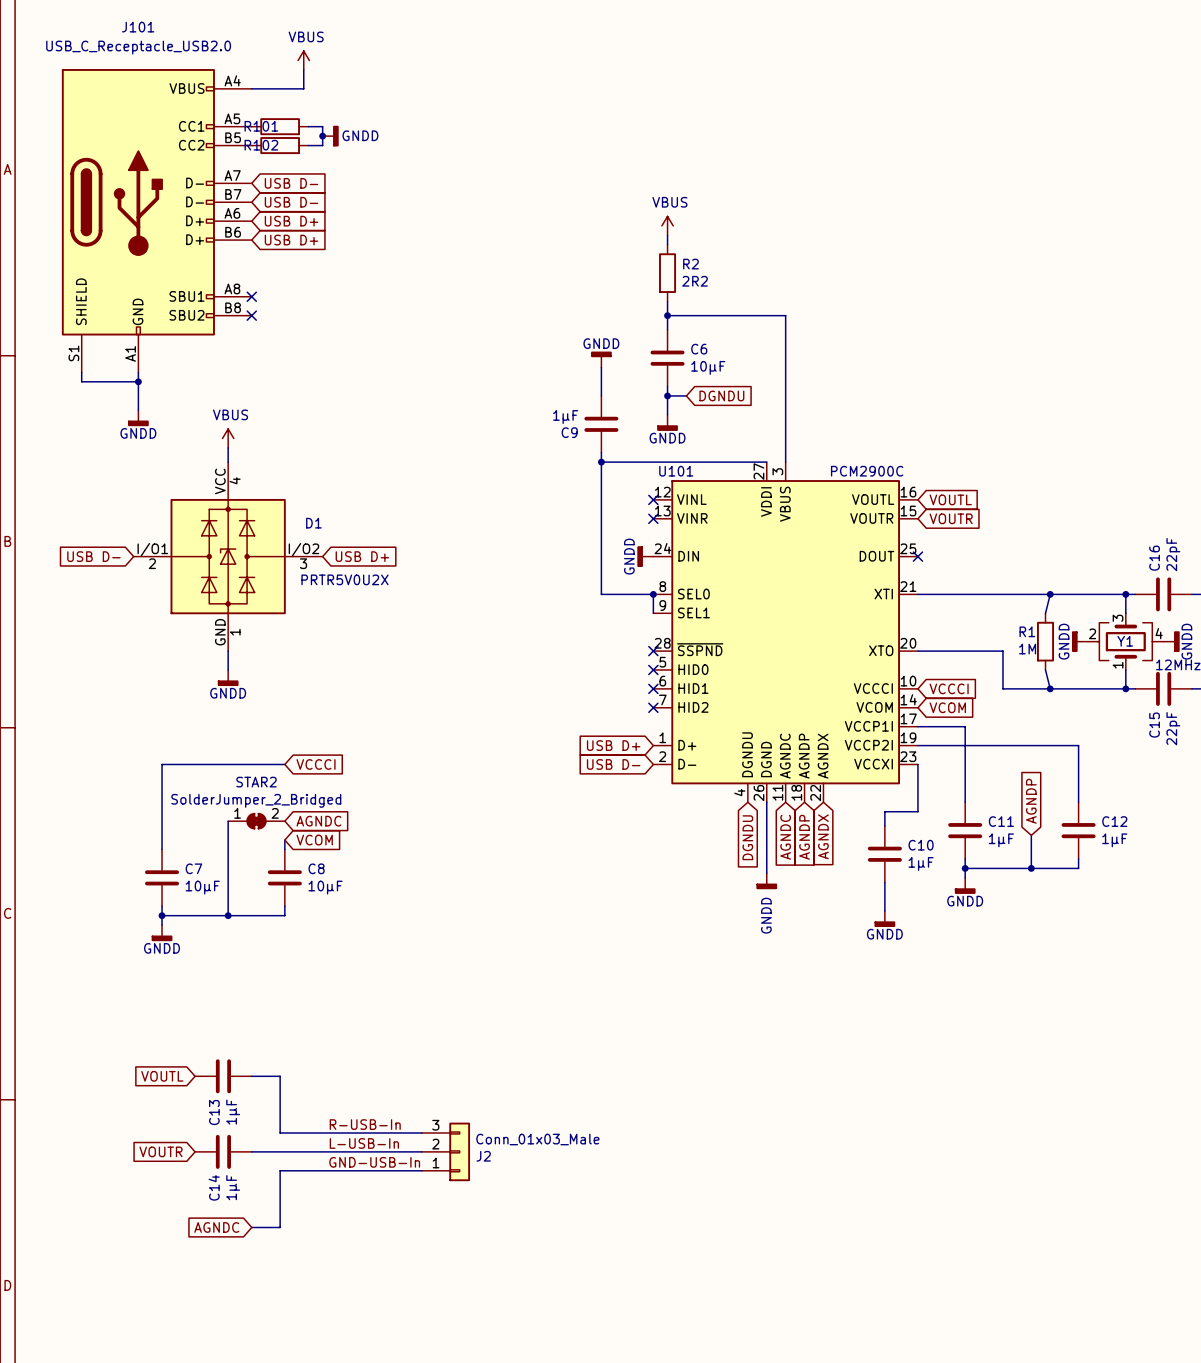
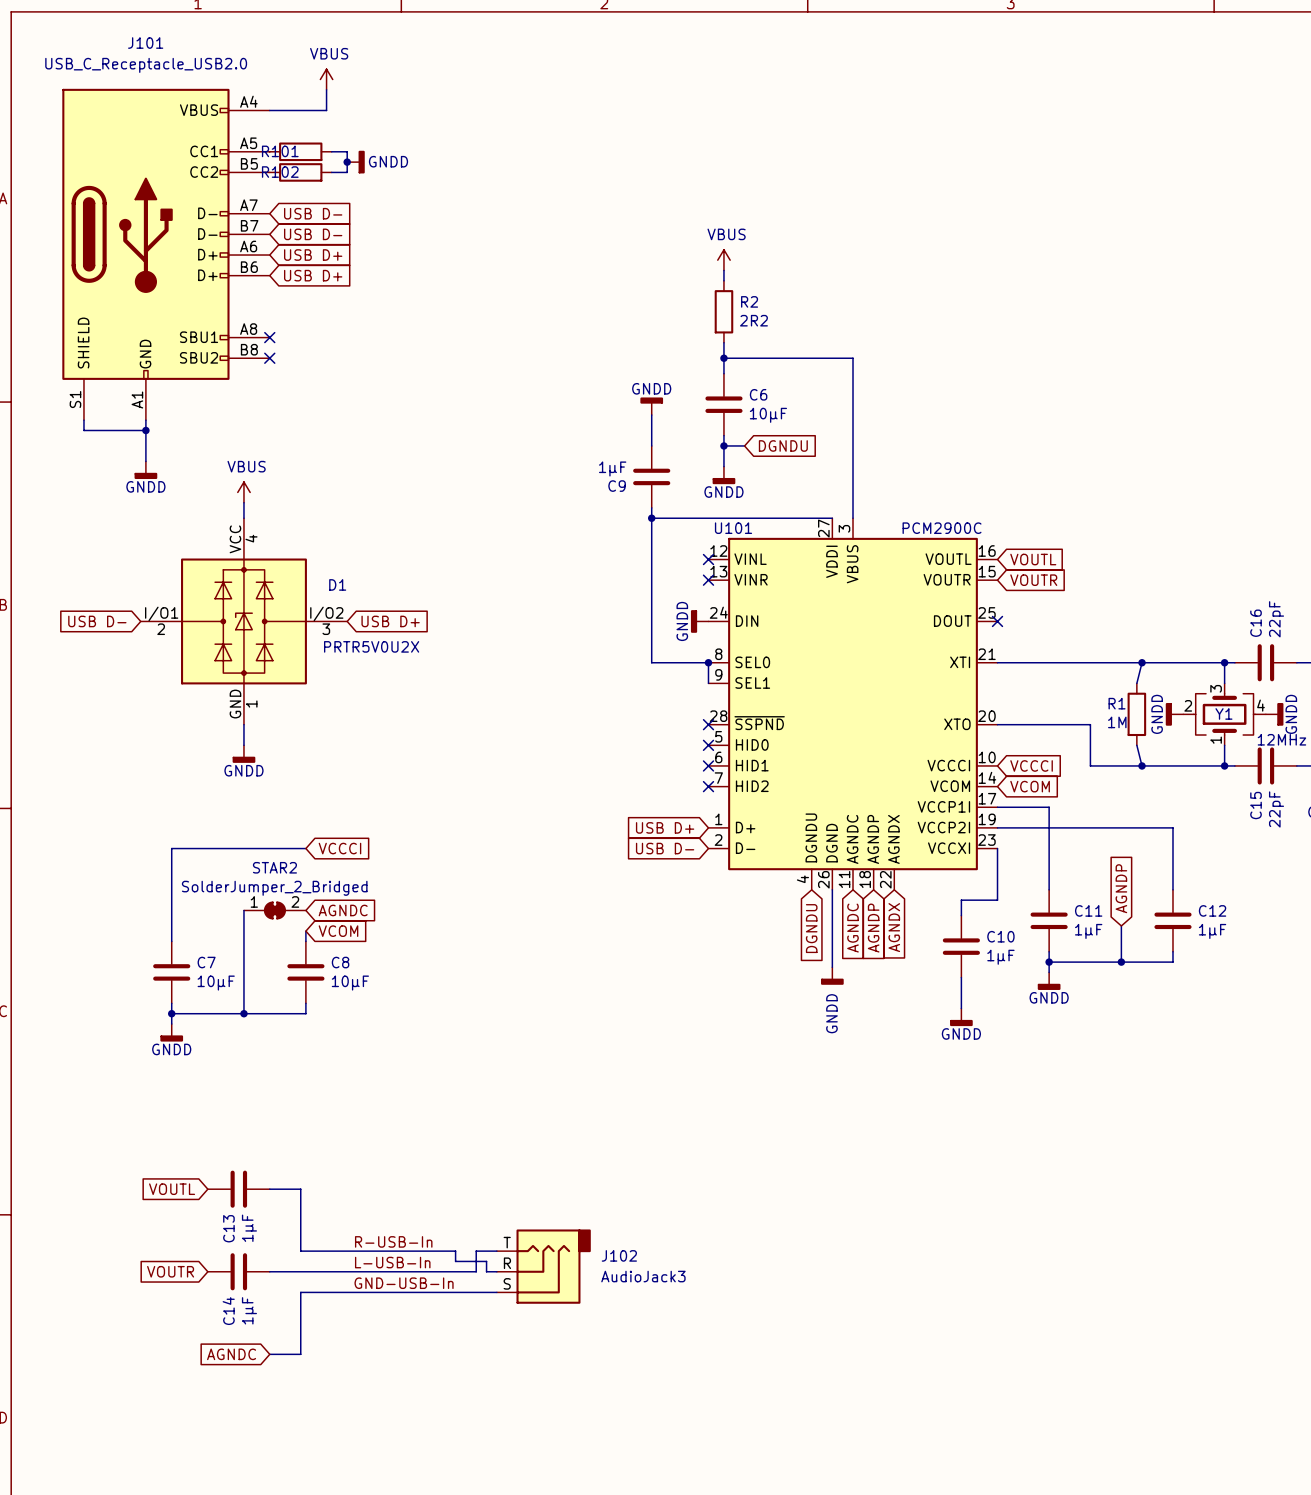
wire: none -> (455, 1251) (455, 1261) (486, 1261) (486, 1271) (496, 1271)
J102: none -> AudioJack3 (543, 1266)
J2: Conn_01x03_Male (445, 1151) -> none

